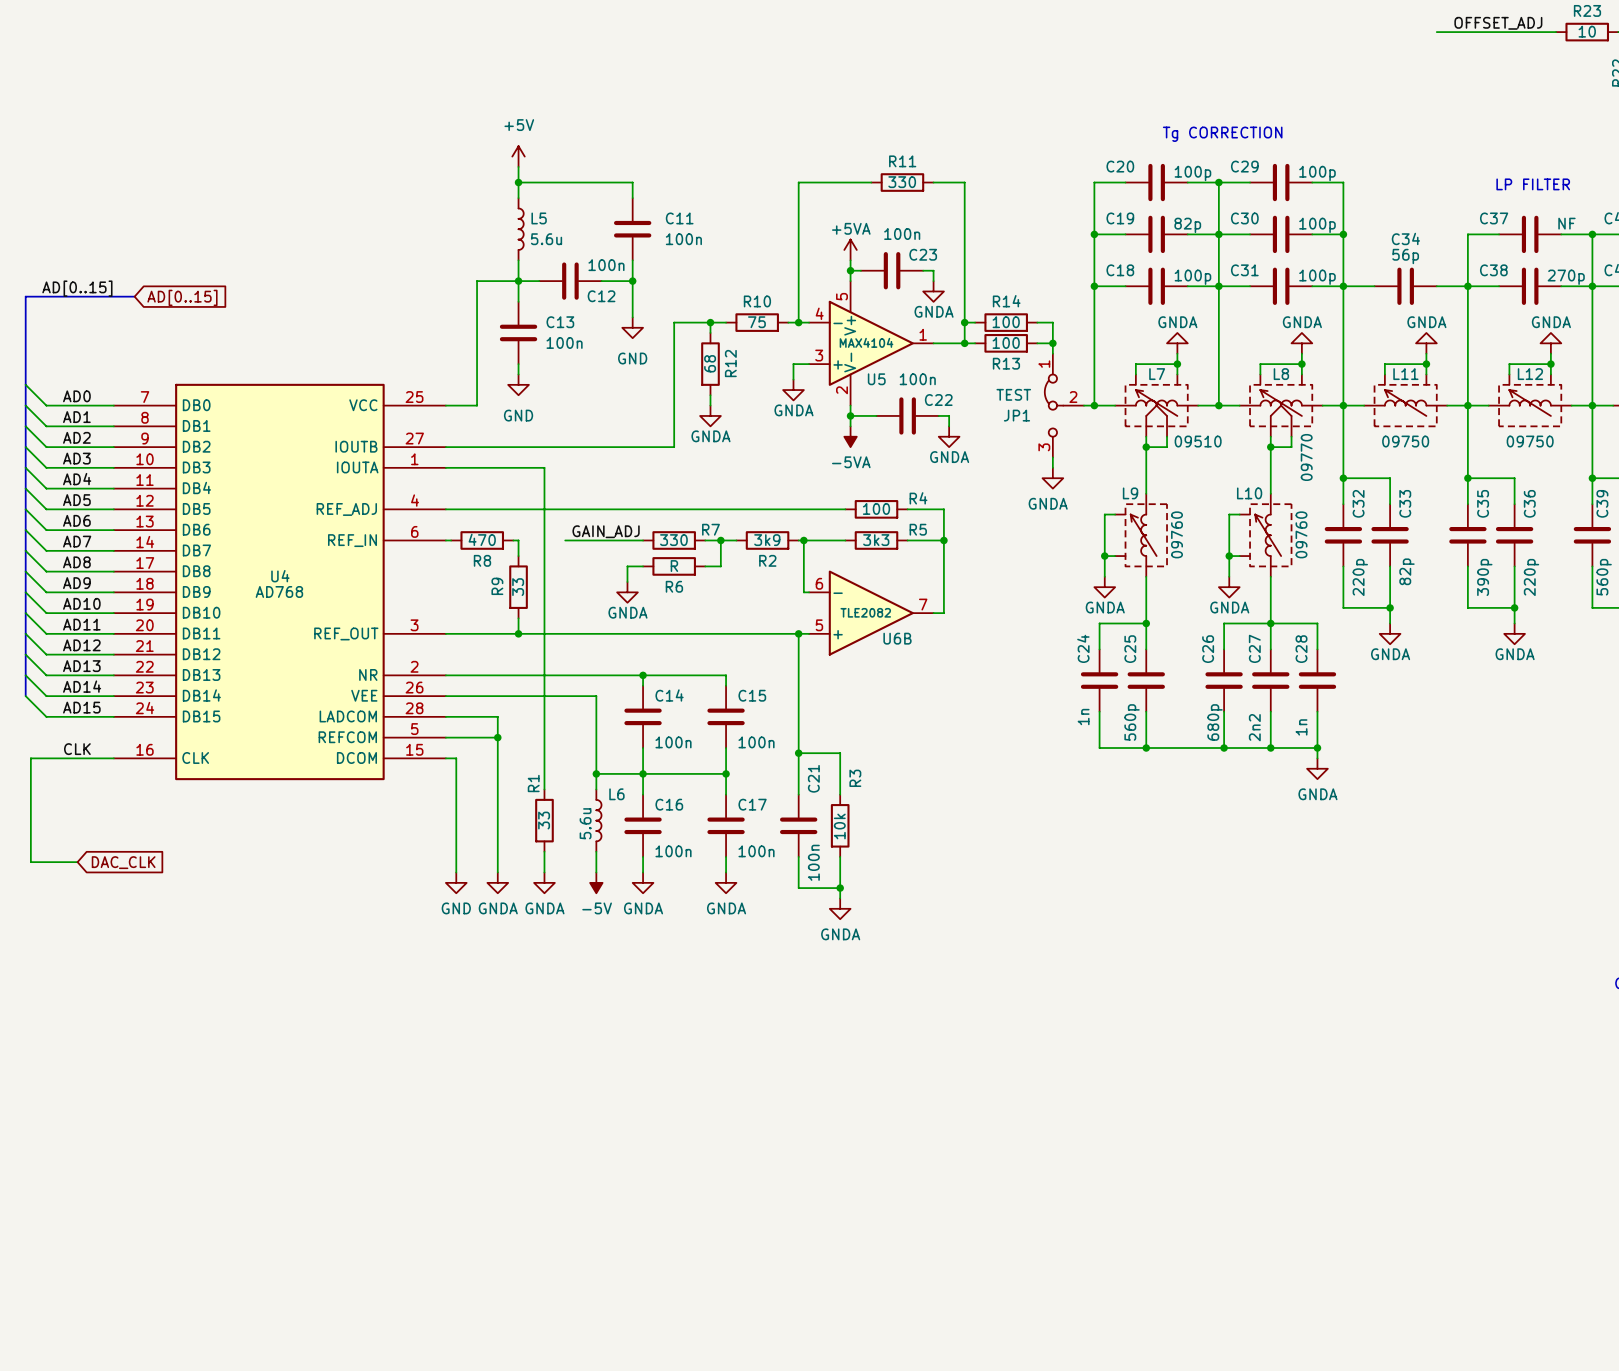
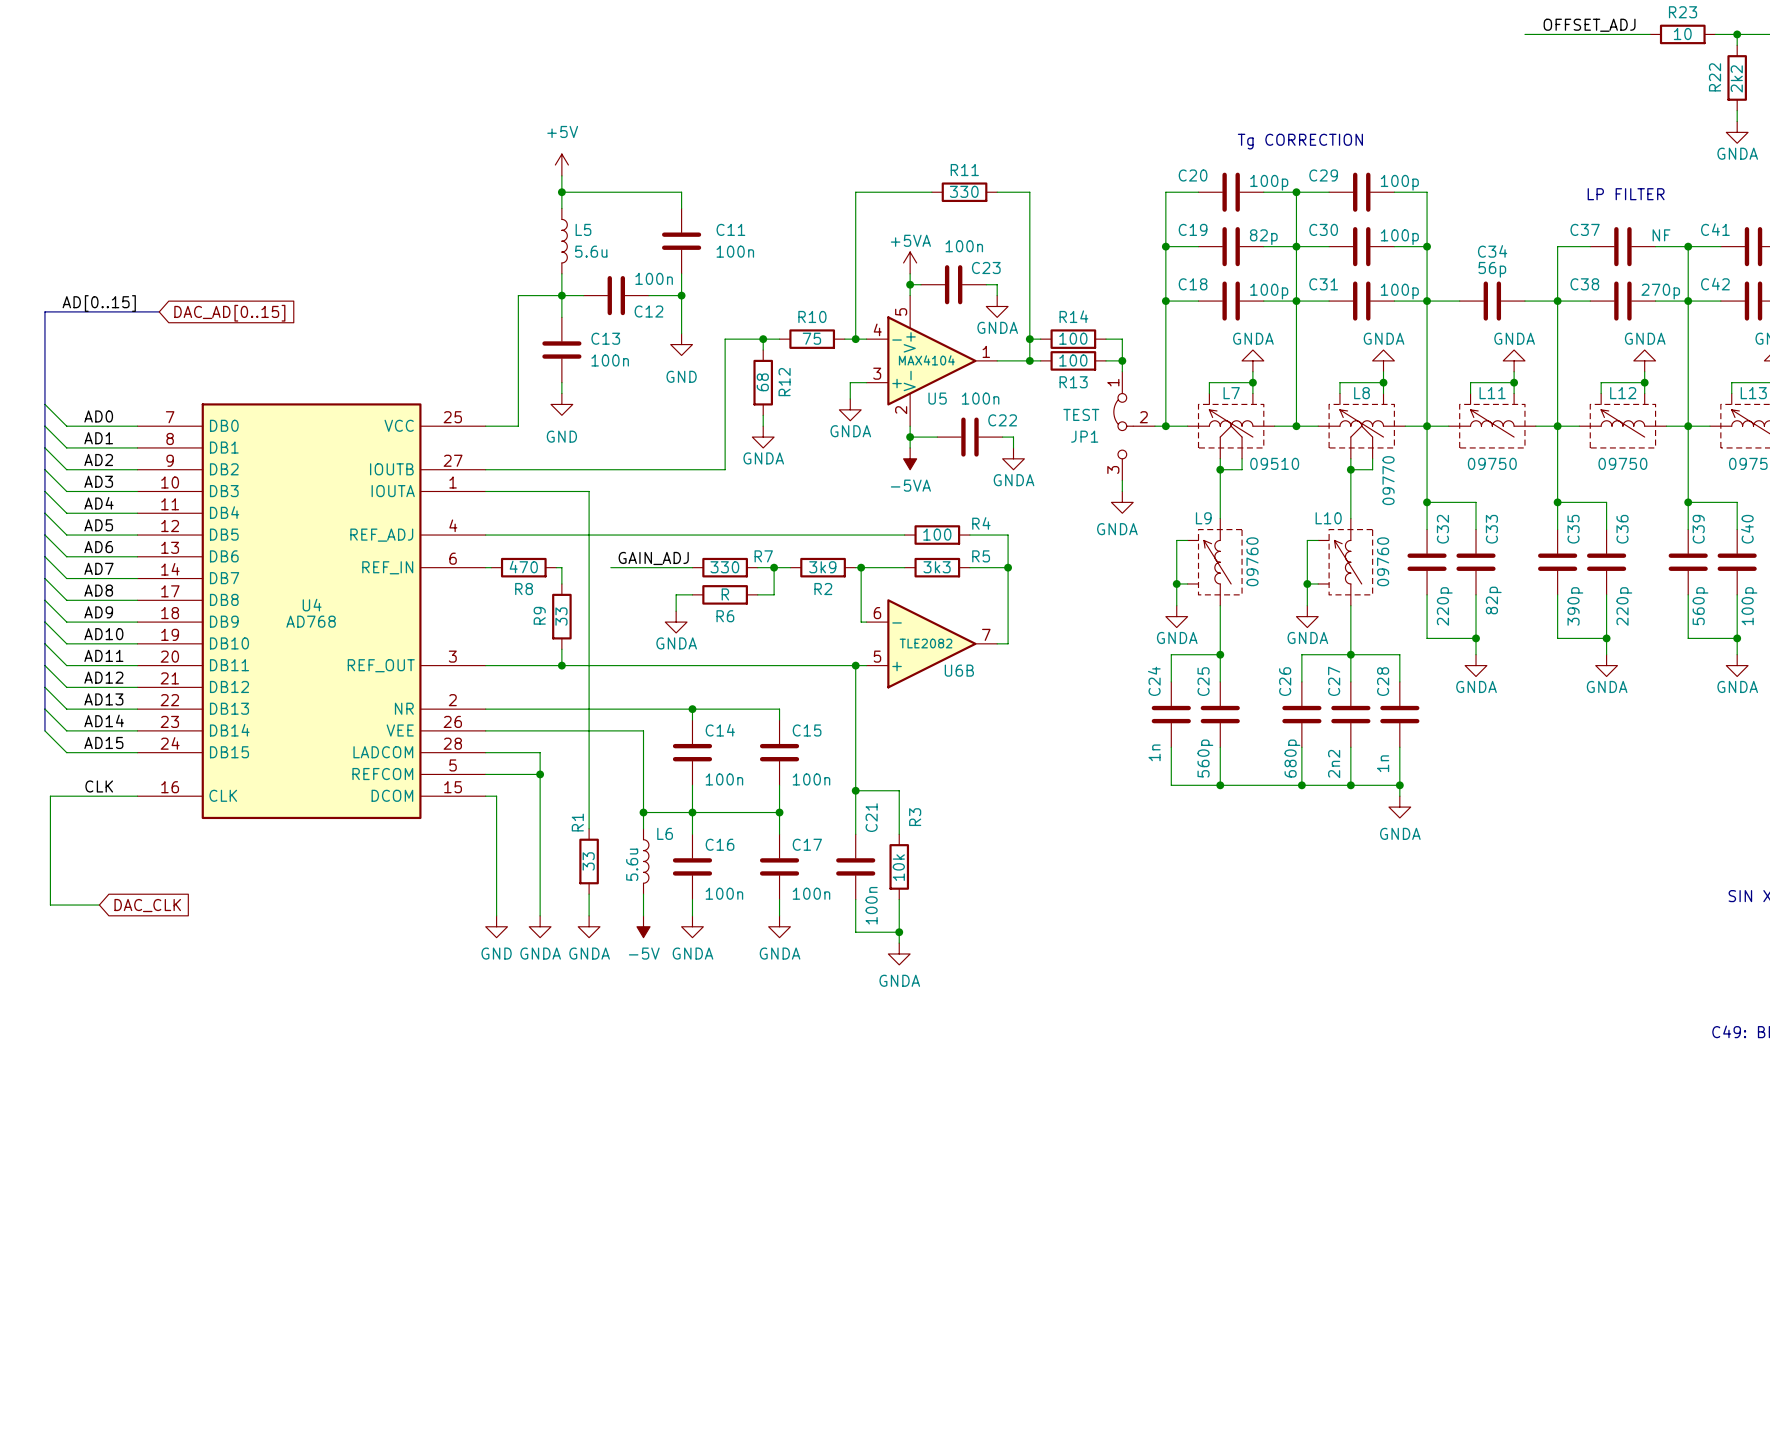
global label: AD[0..15] (182, 297) -> DAC_AD[0..15] (229, 313)

